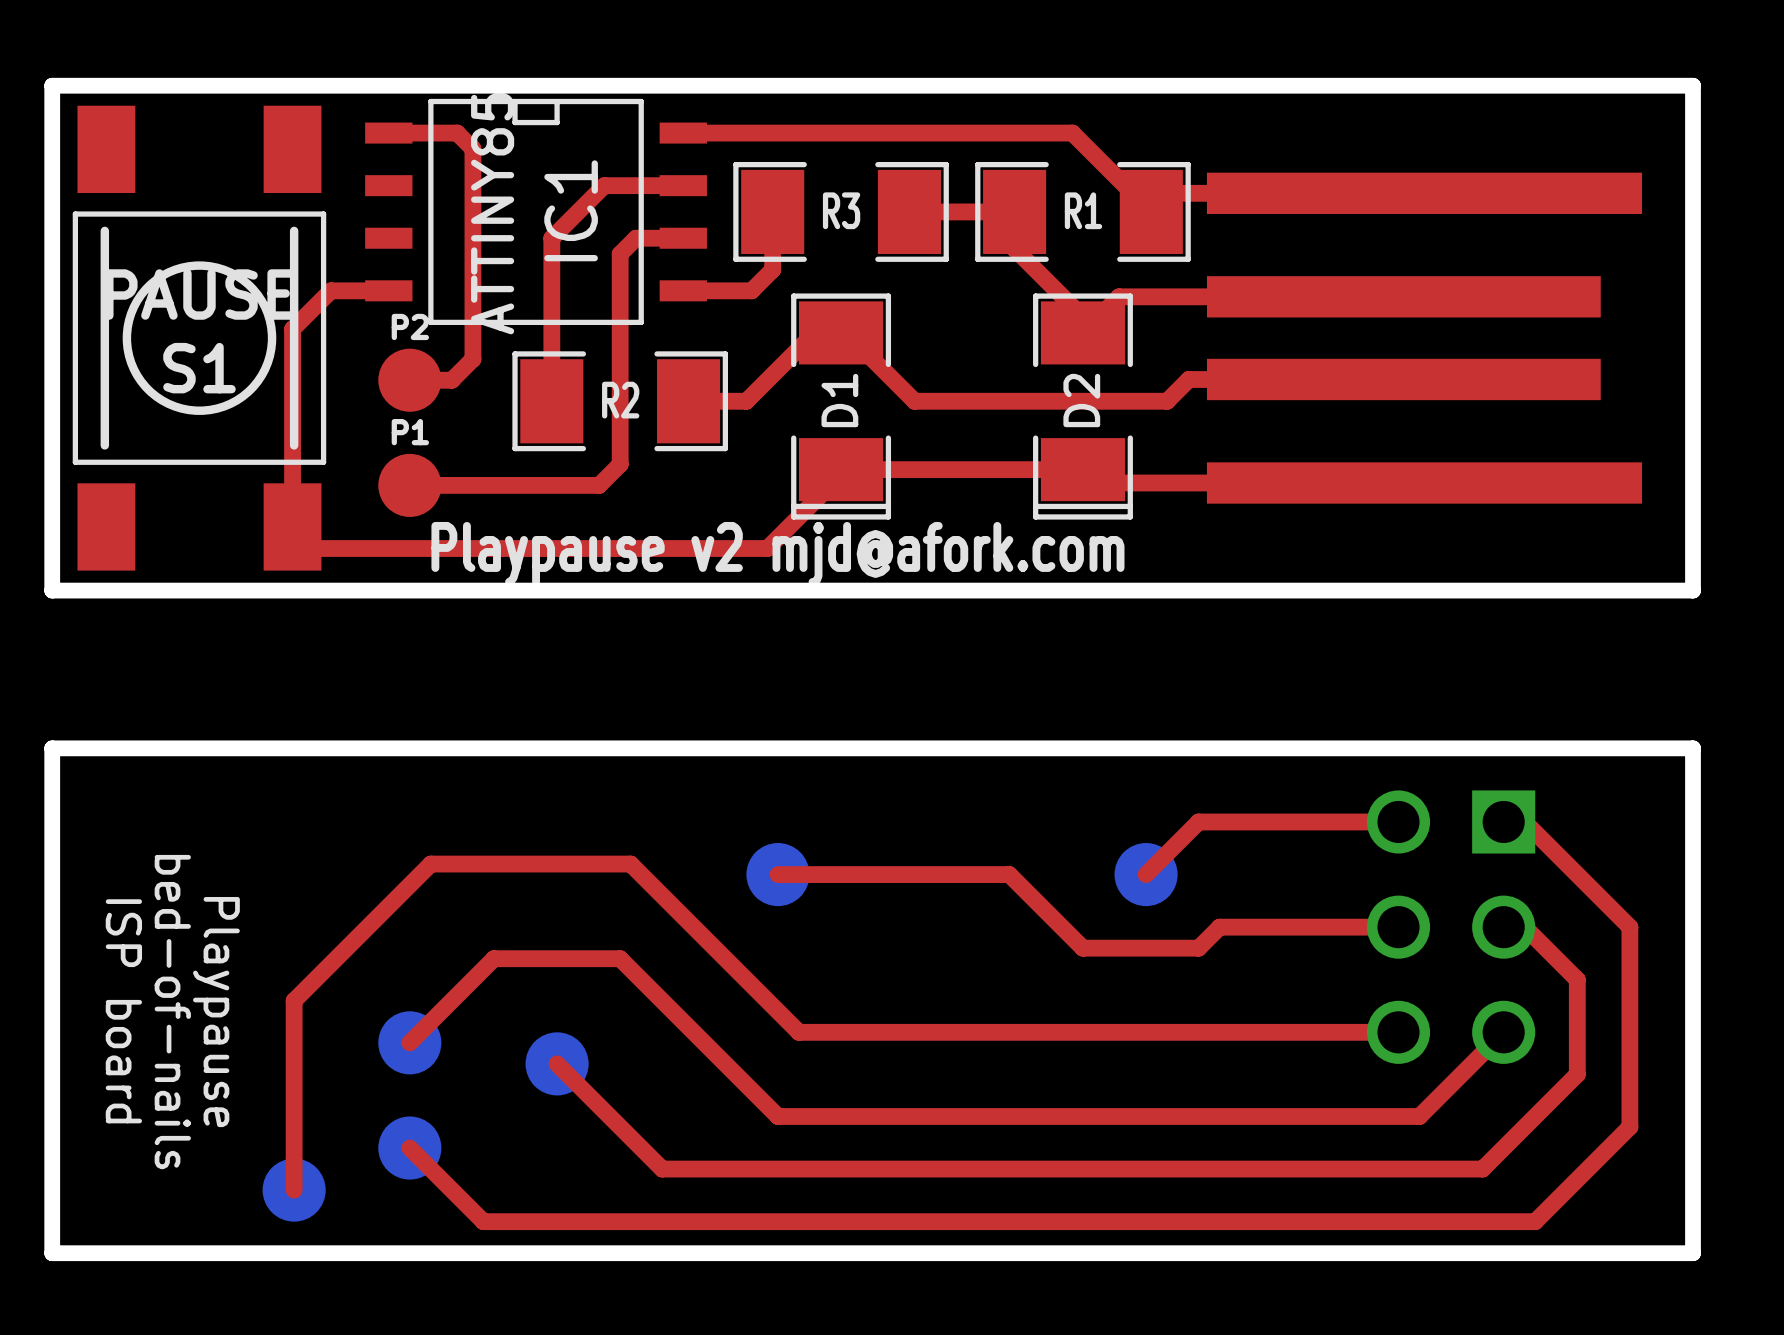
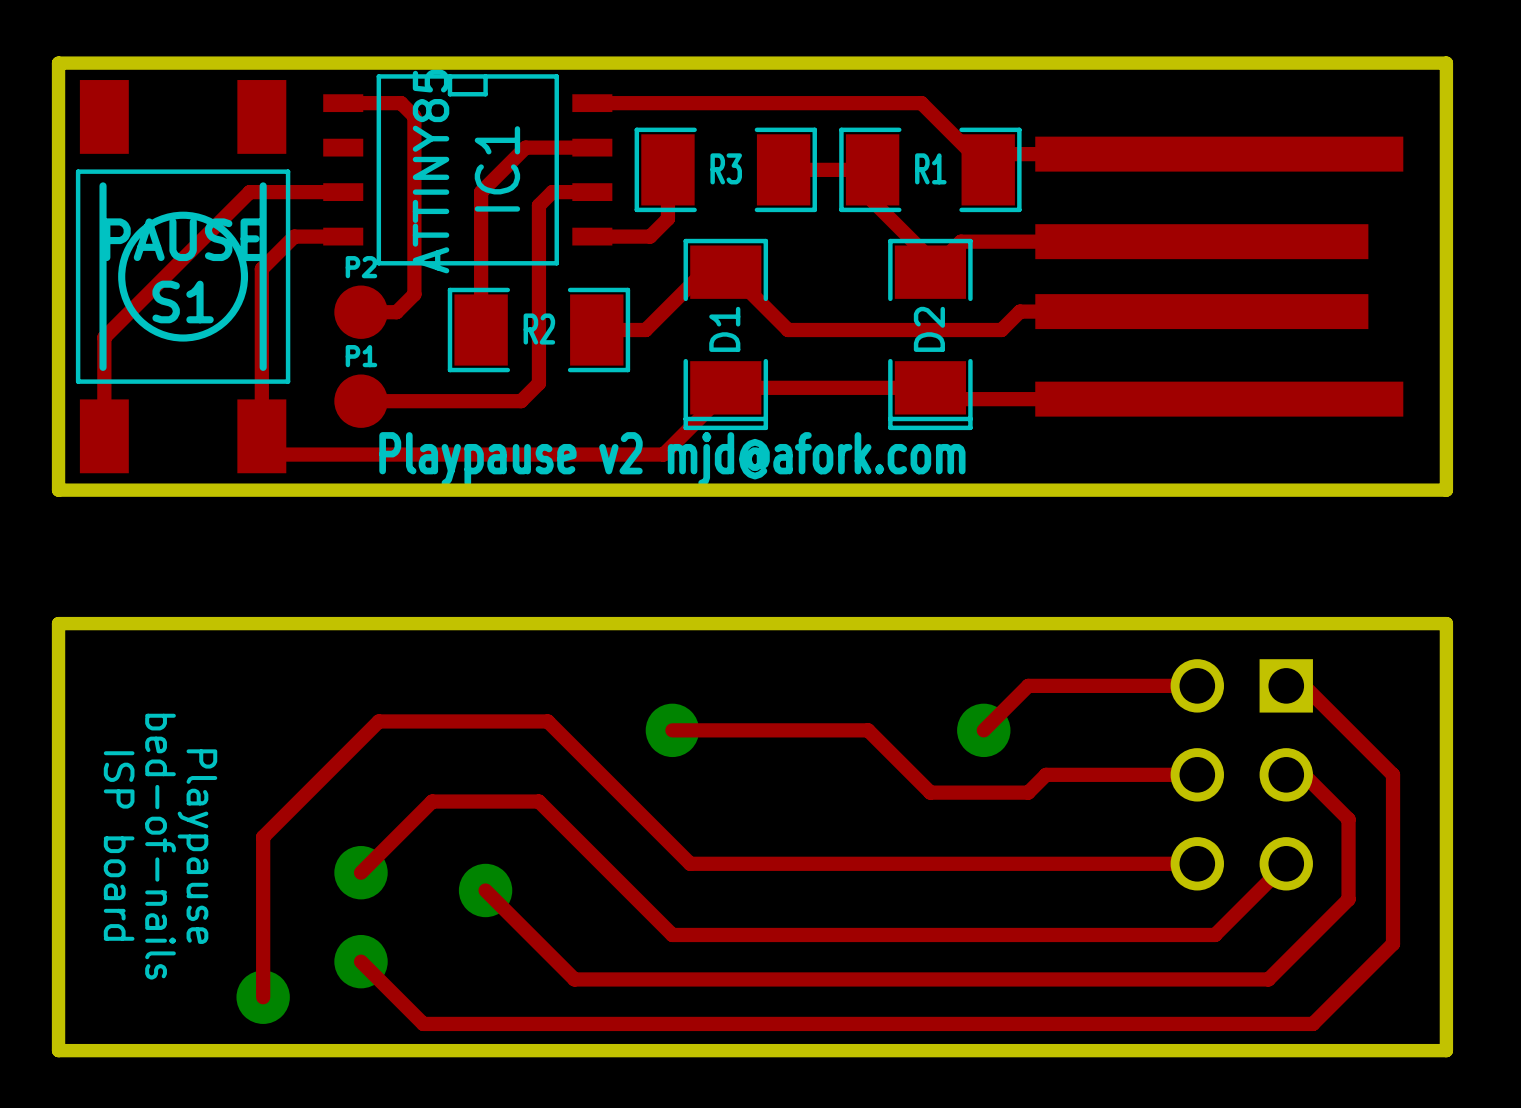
top track: none -> (343, 192) (249, 192) (104, 337) (104, 436)

